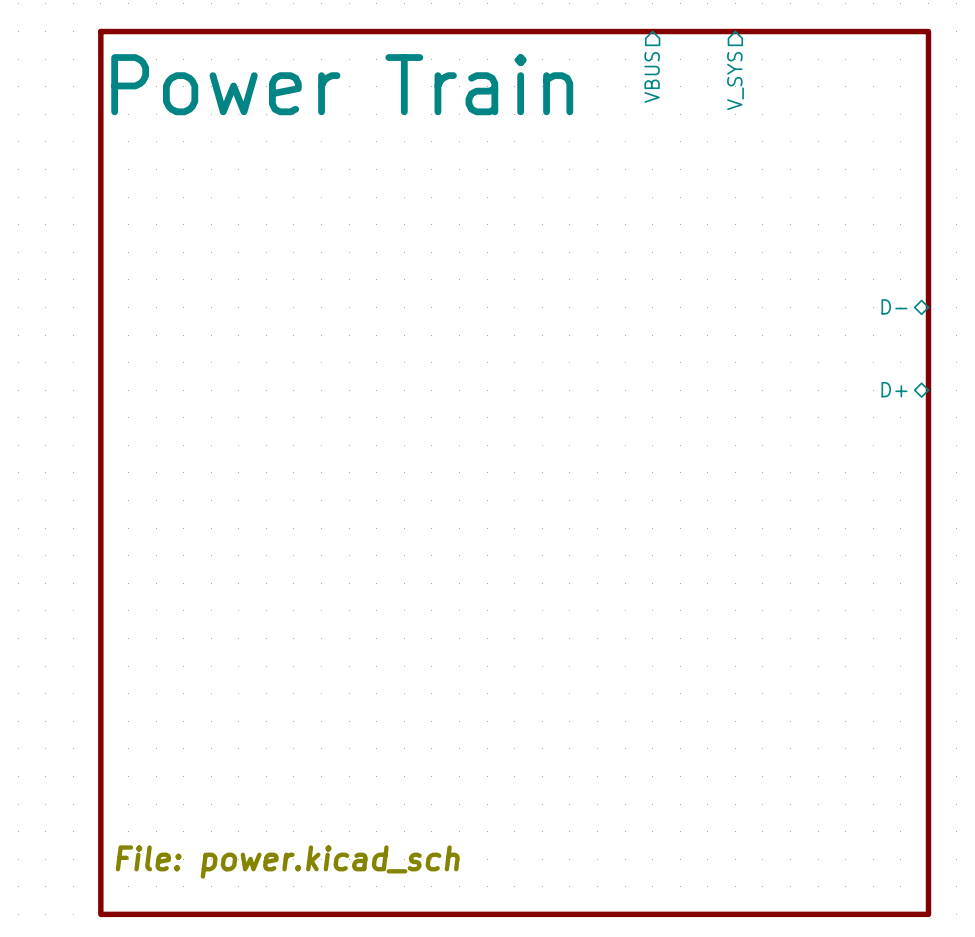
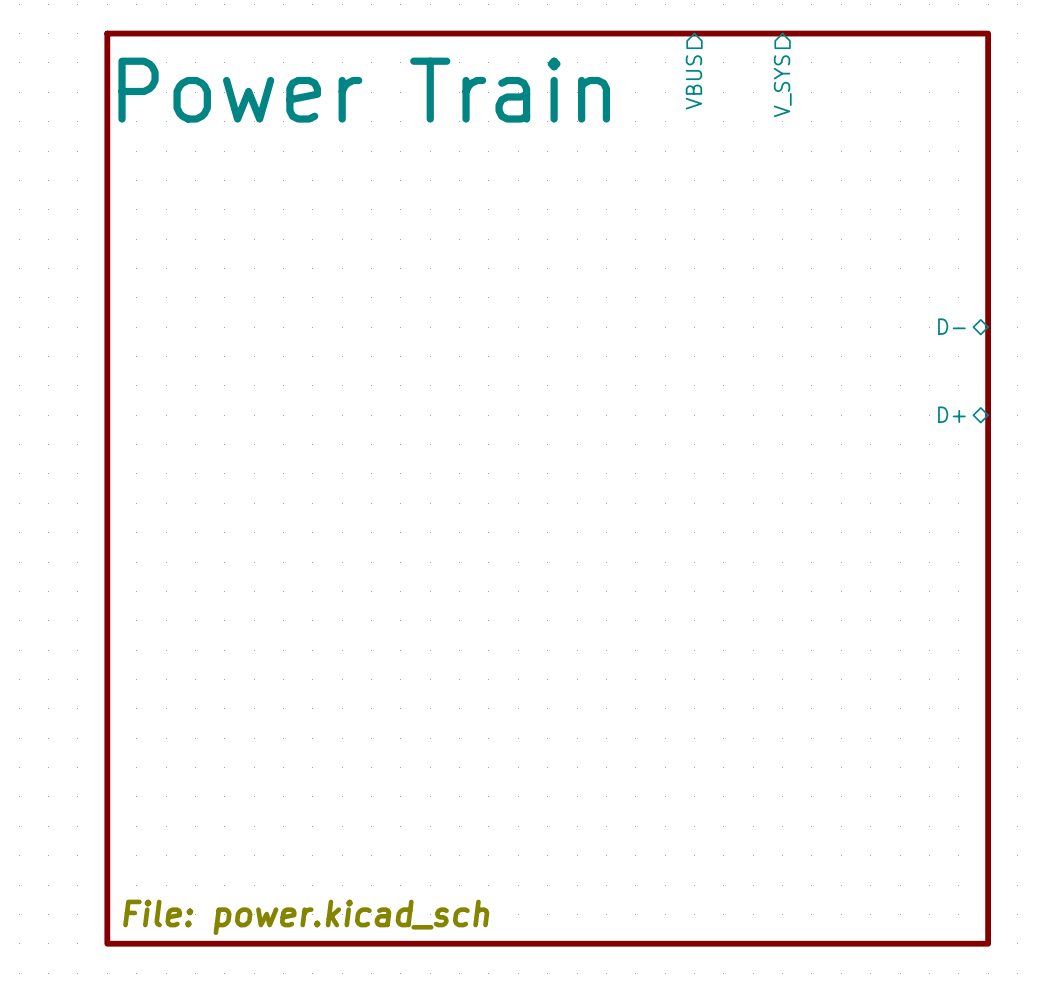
sheet Power Train: none -> File: power.kicad_sch (547, 488)
sheet Power Train: File: power.kicad_sch (514, 472) -> none

